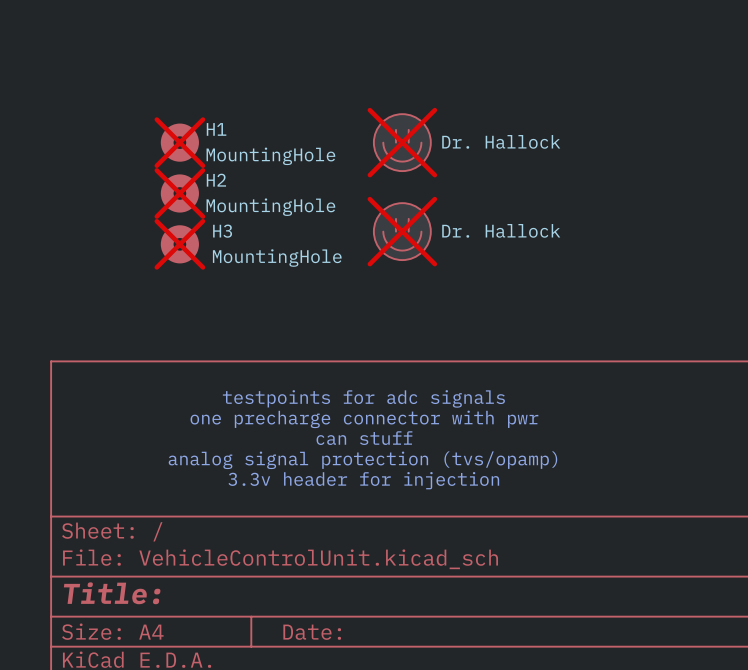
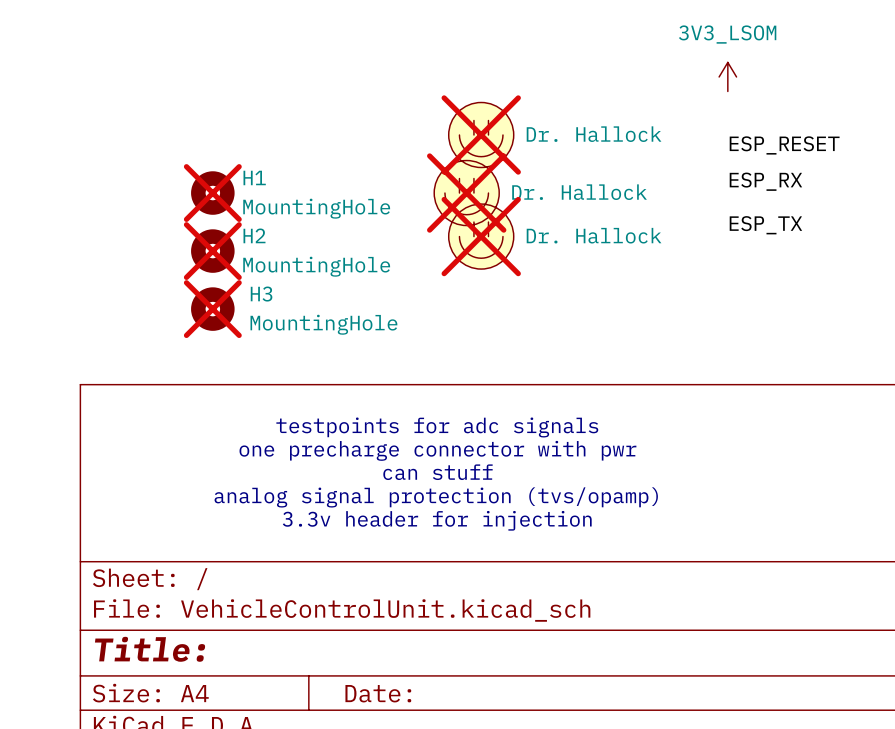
power symbol: none -> 3V3_LSOM (727, 76)
H1 position: (179, 142) -> (212, 193)
label: none -> ESP_RESET (784, 145)
label: none -> ESP_RX (765, 181)
H2 position: (179, 193) -> (212, 251)
part: none -> Dr. Hallock (466, 193)
label: none -> ESP_TX (765, 225)
H3 position: (179, 244) -> (212, 309)

